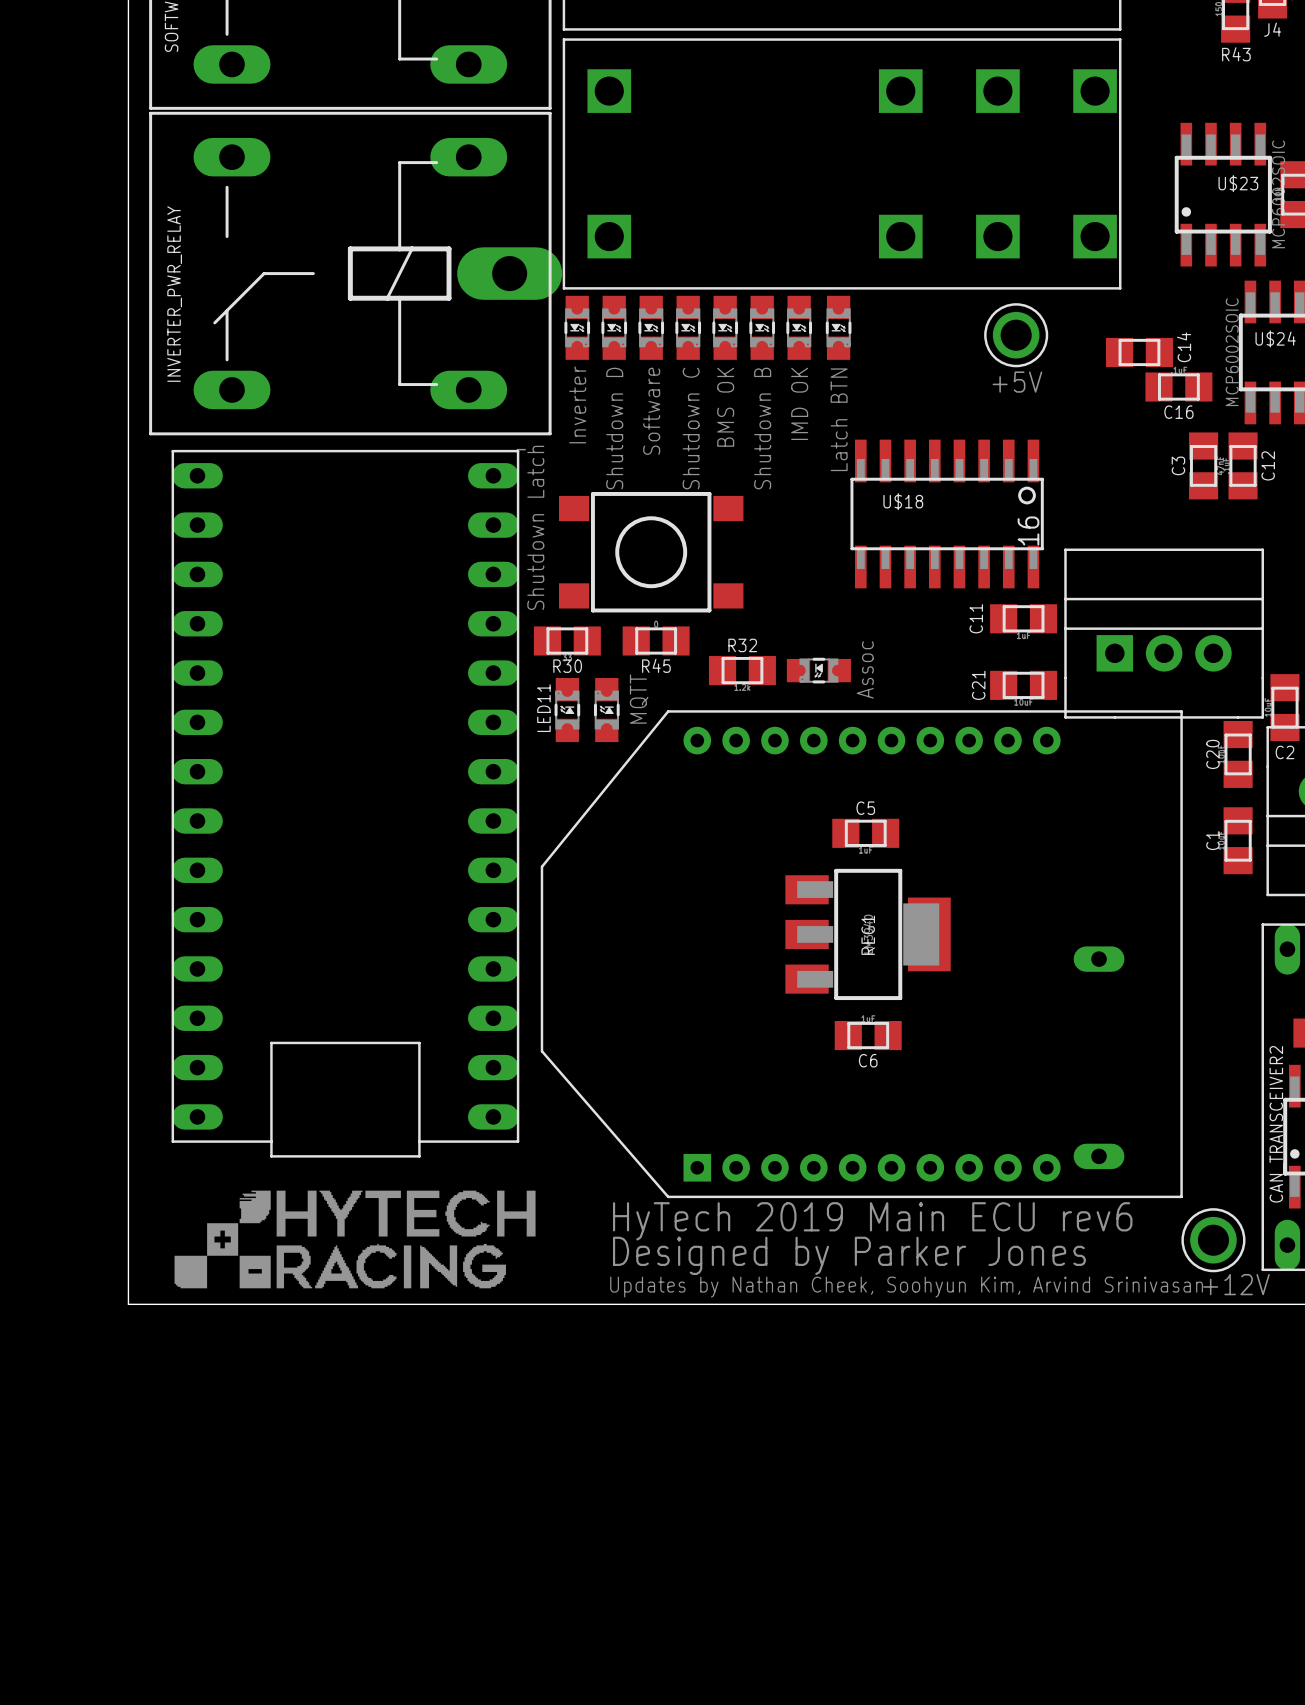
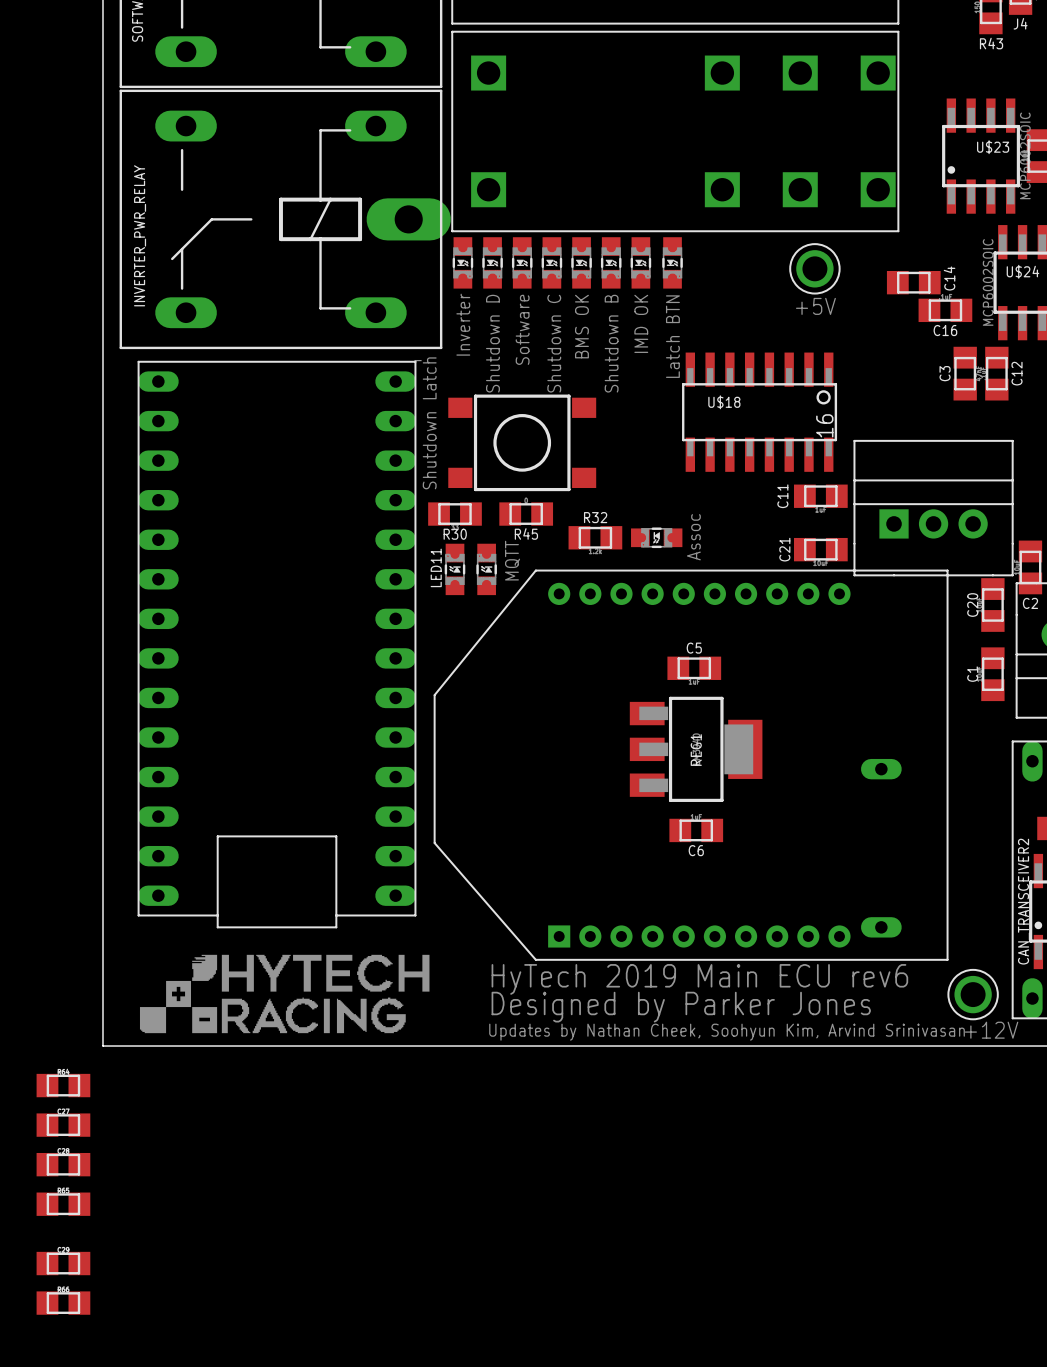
part: none -> (63, 1085)
part: none -> (63, 1125)
part: none -> (63, 1164)
part: none -> (63, 1204)
part: none -> (63, 1263)
part: none -> (63, 1303)

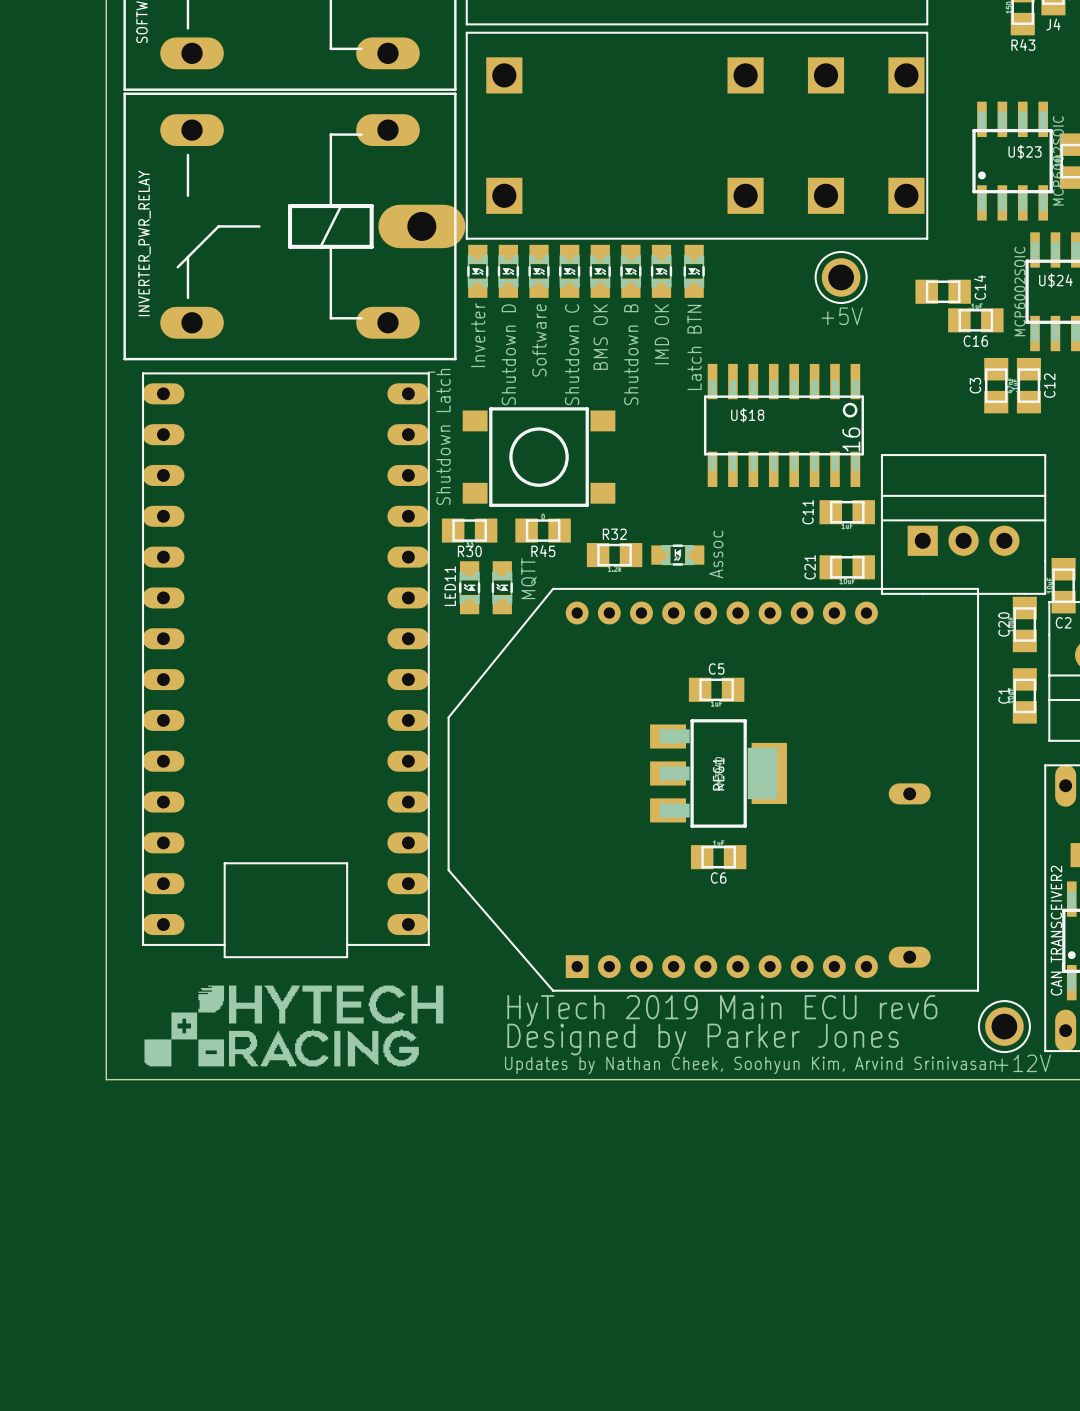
part: (63, 1085) -> none
part: (63, 1125) -> none
part: (63, 1164) -> none
part: (63, 1204) -> none
part: (63, 1263) -> none
part: (63, 1303) -> none

